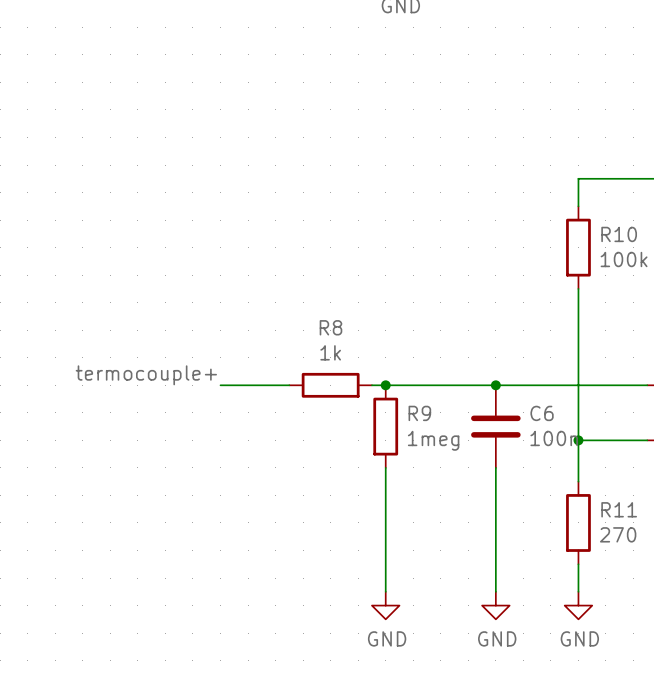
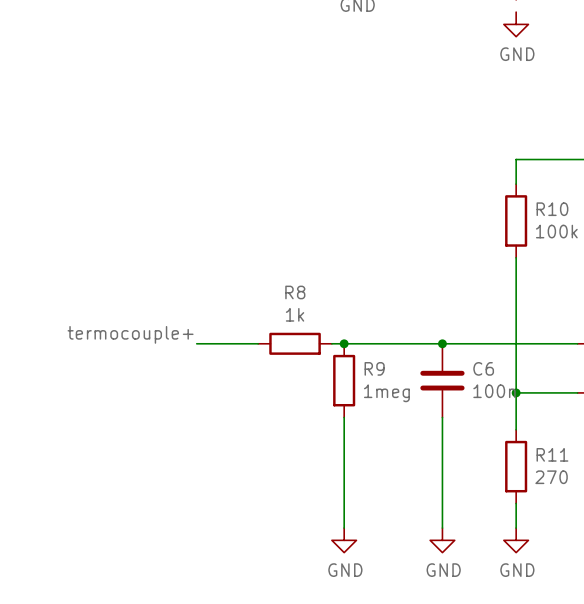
power symbol: none -> GND (516, 24)

